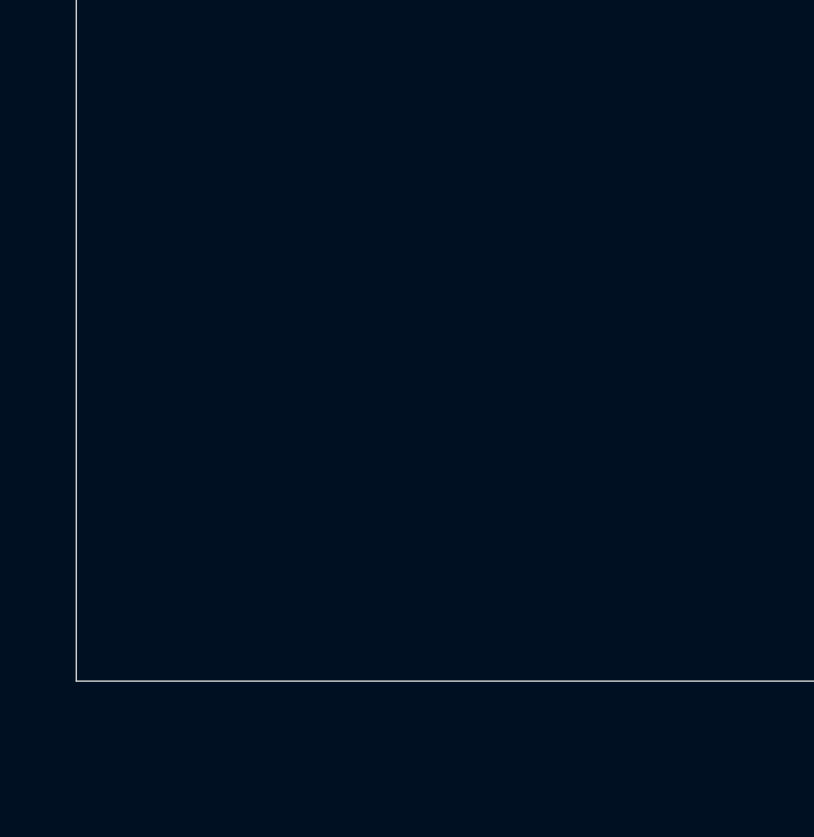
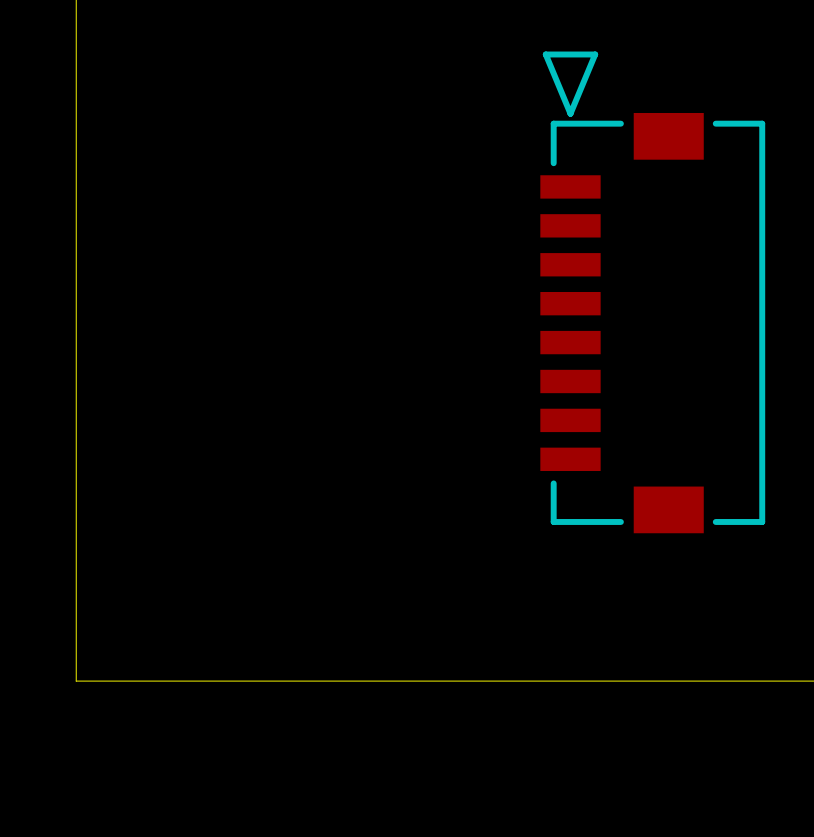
part: none -> (652, 292)

